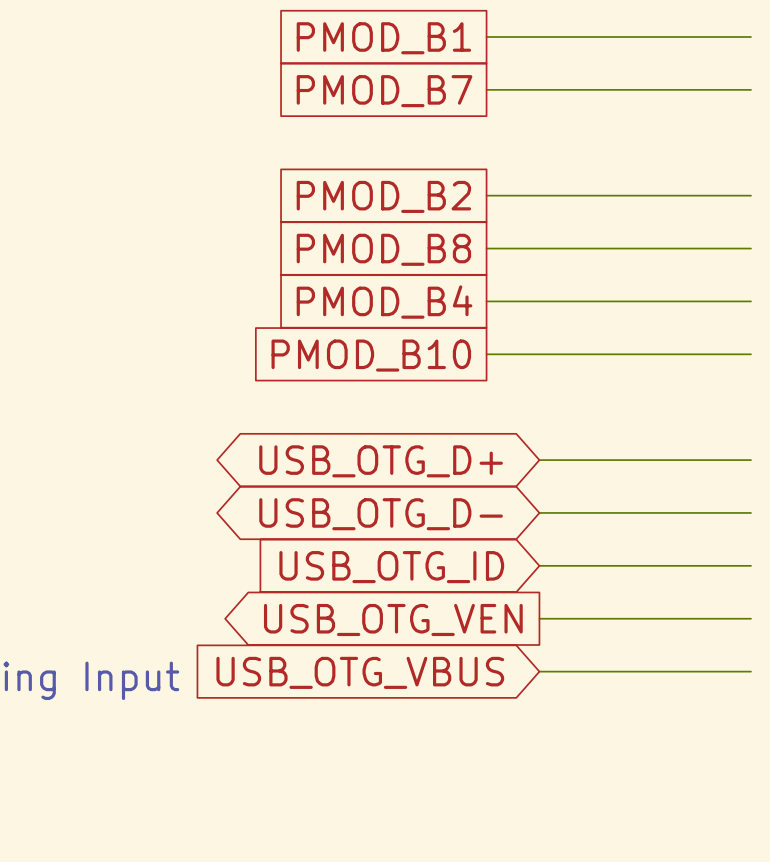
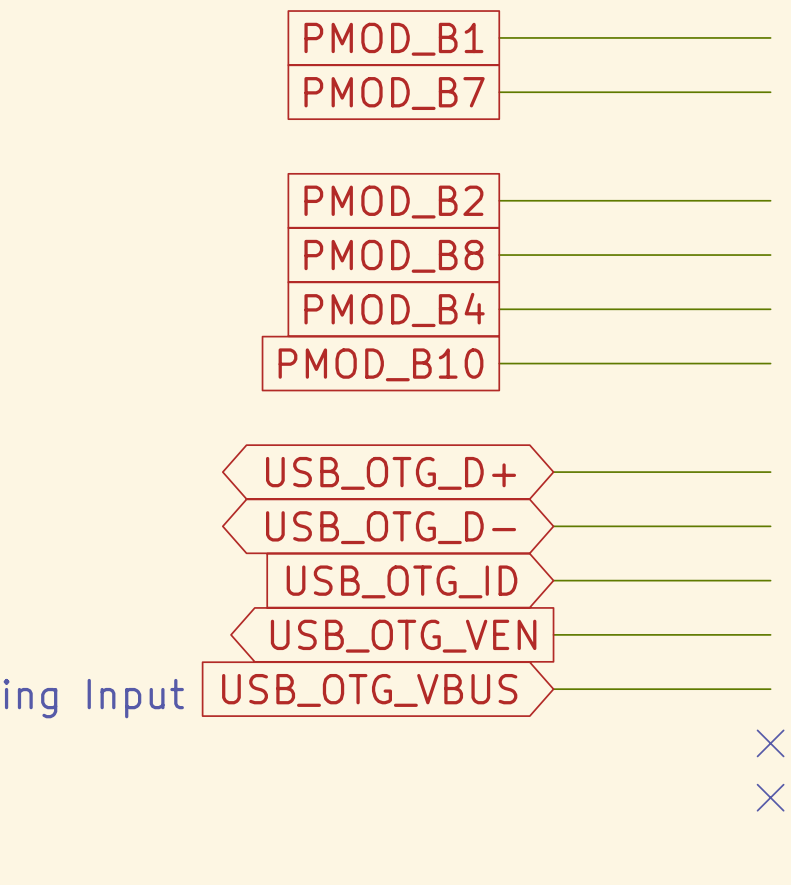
no-connect mark: none -> (770, 743)
no-connect mark: none -> (770, 797)

